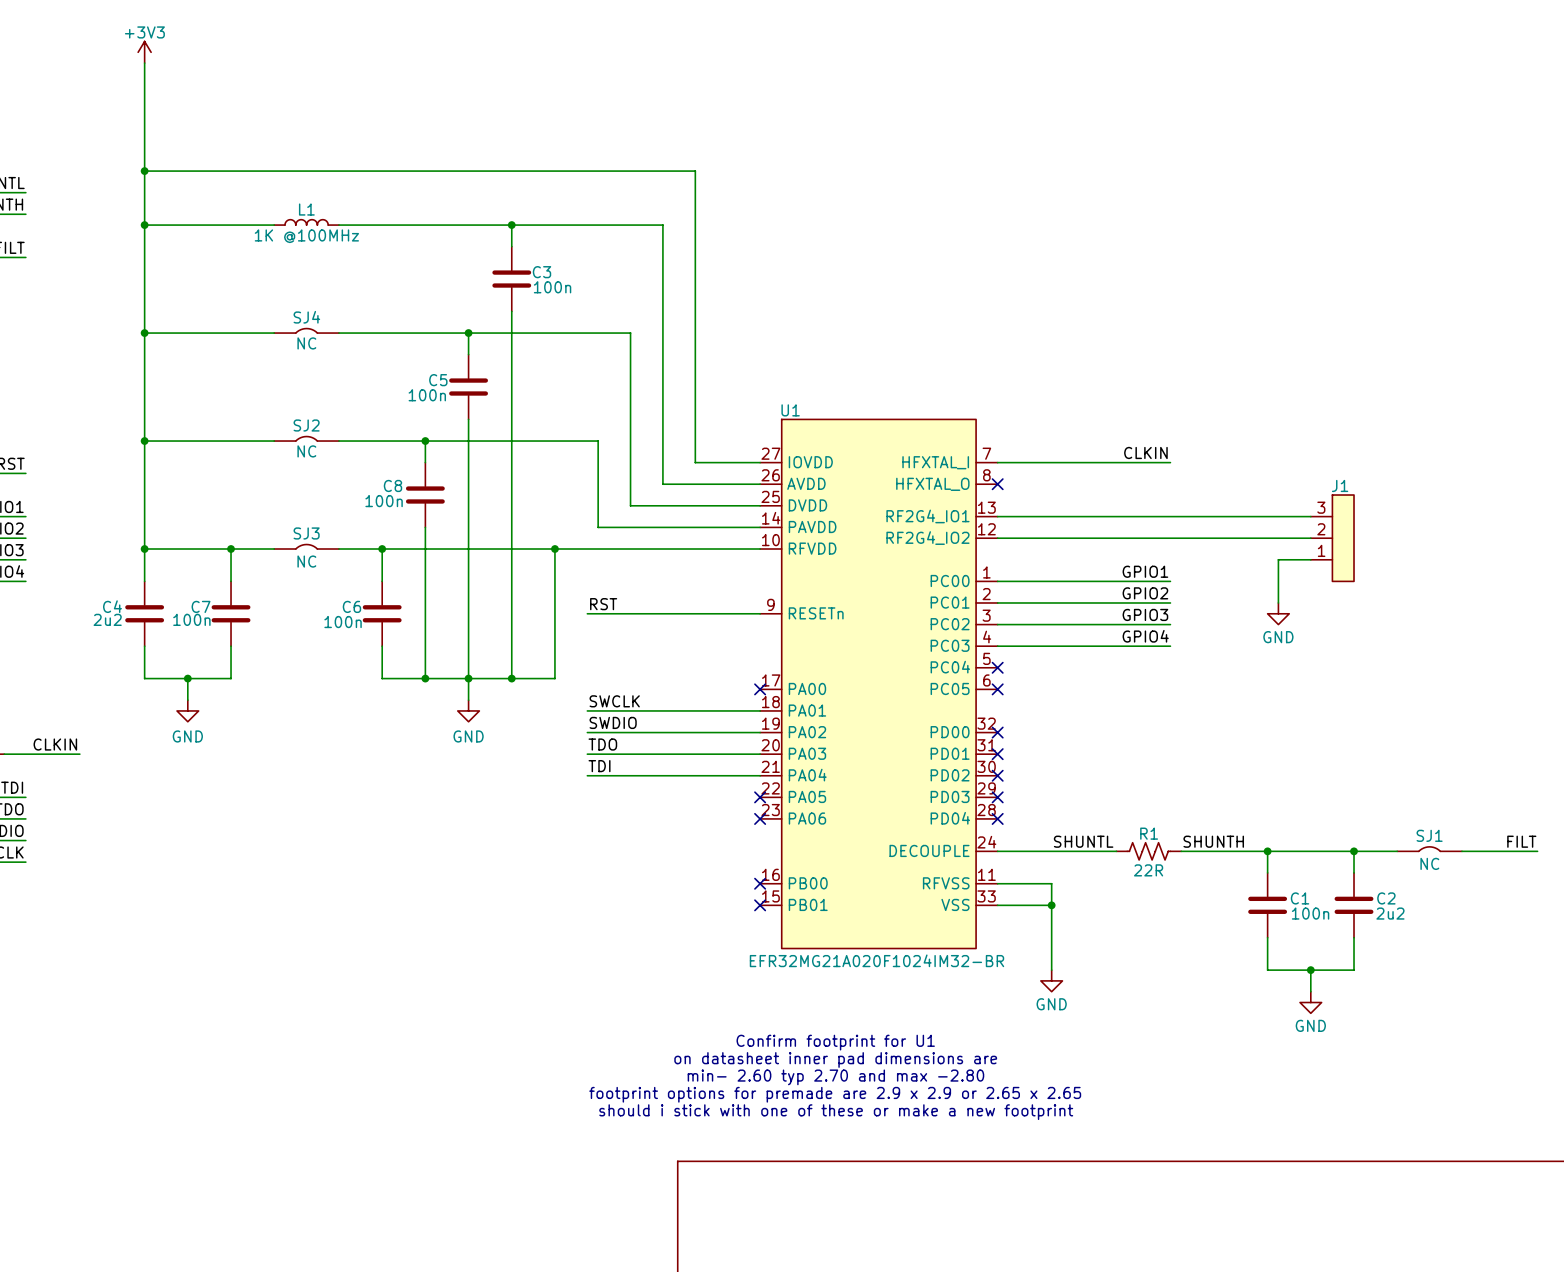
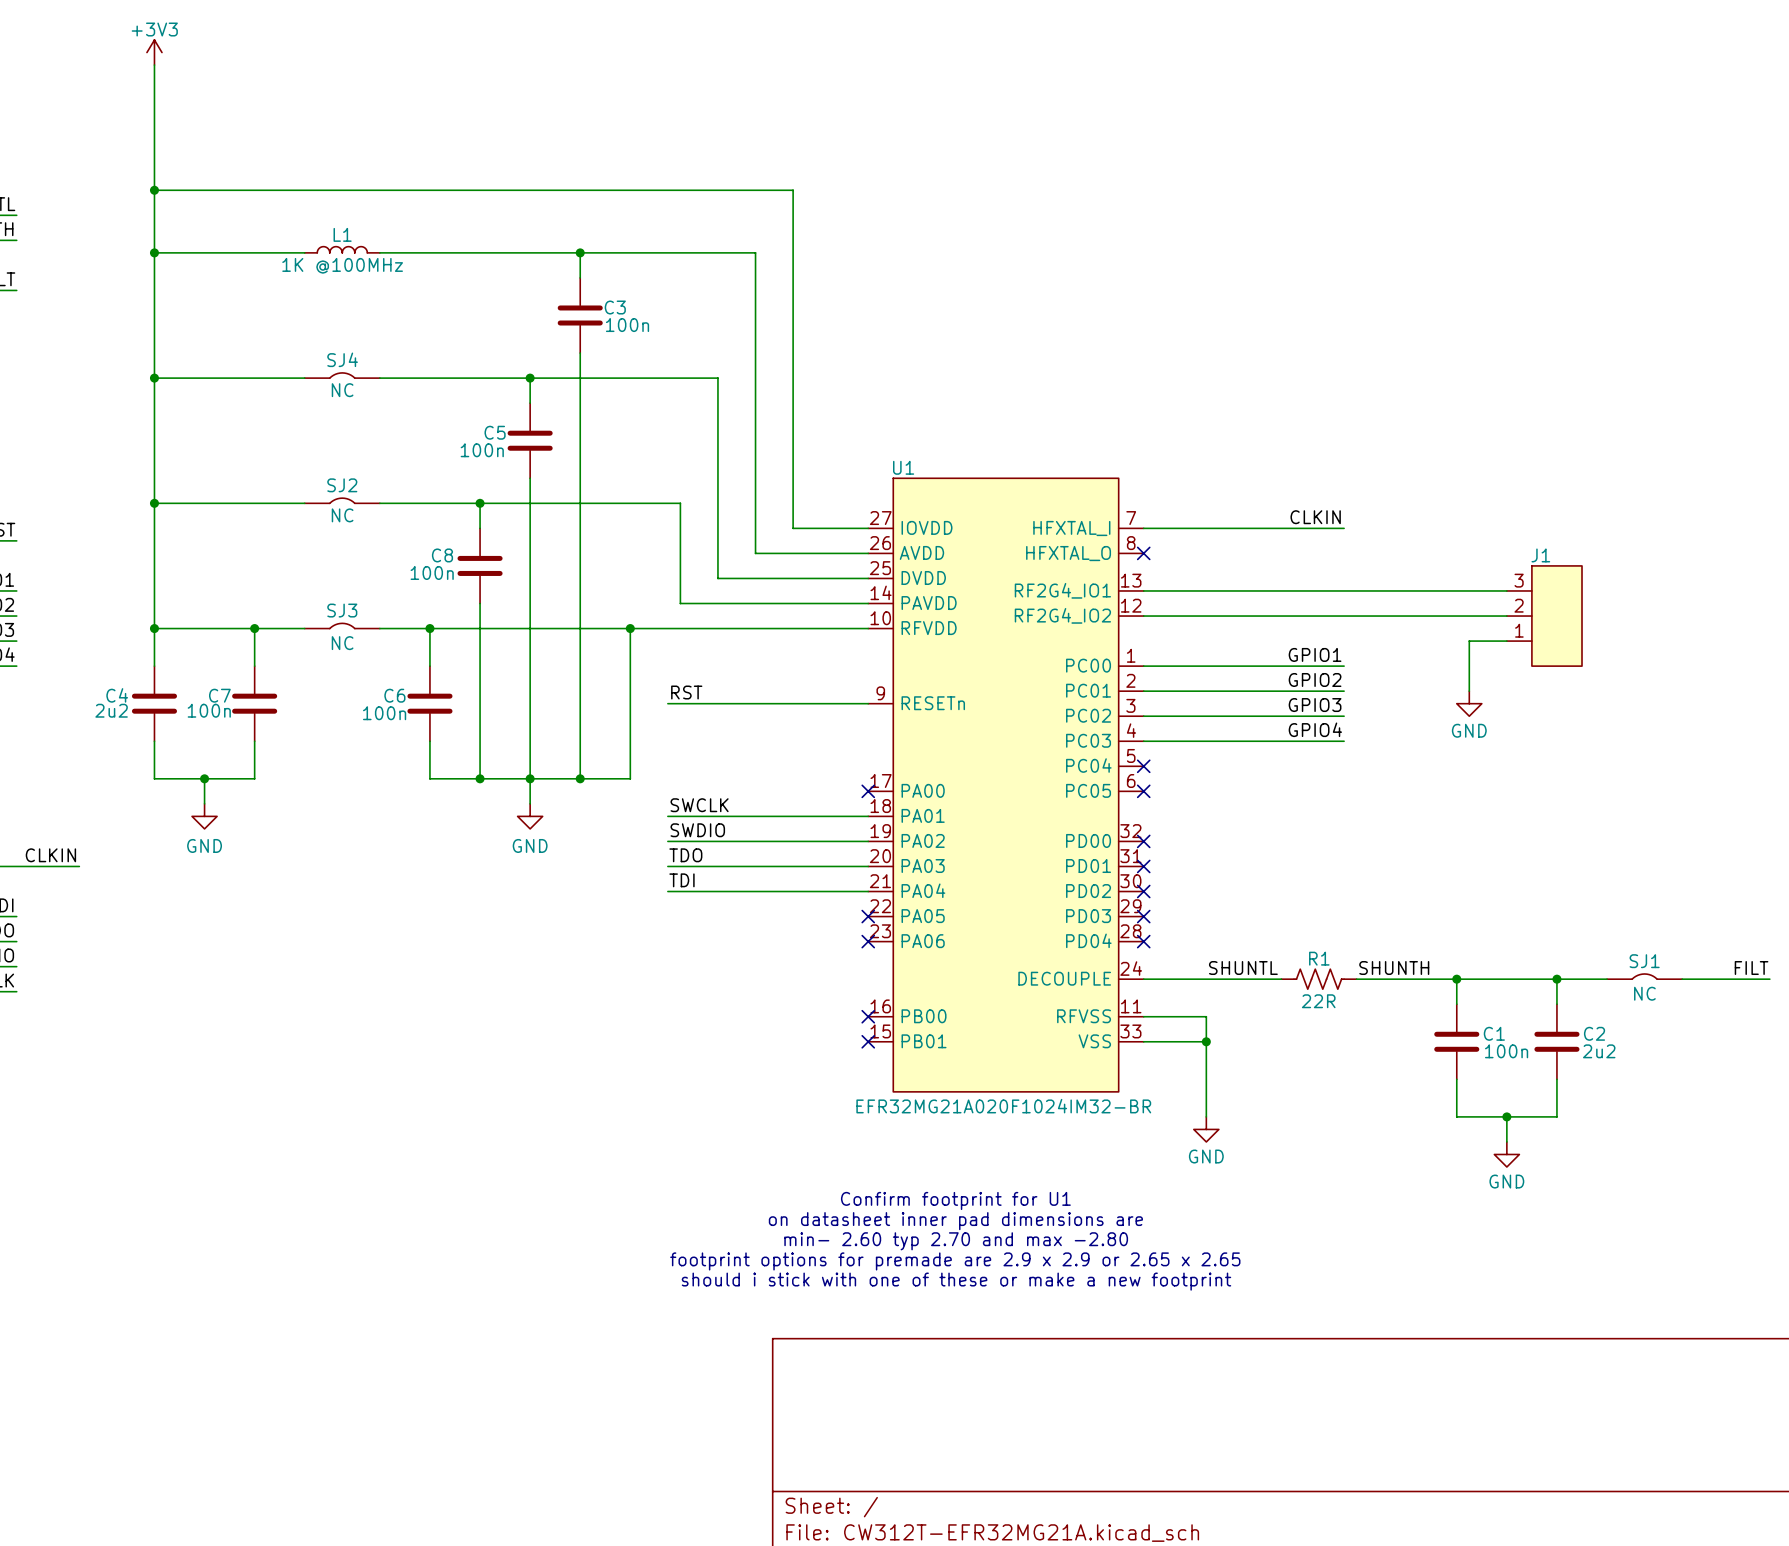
J1 symbol: [1310, 495, 1355, 582] -> [1506, 565, 1583, 667]

